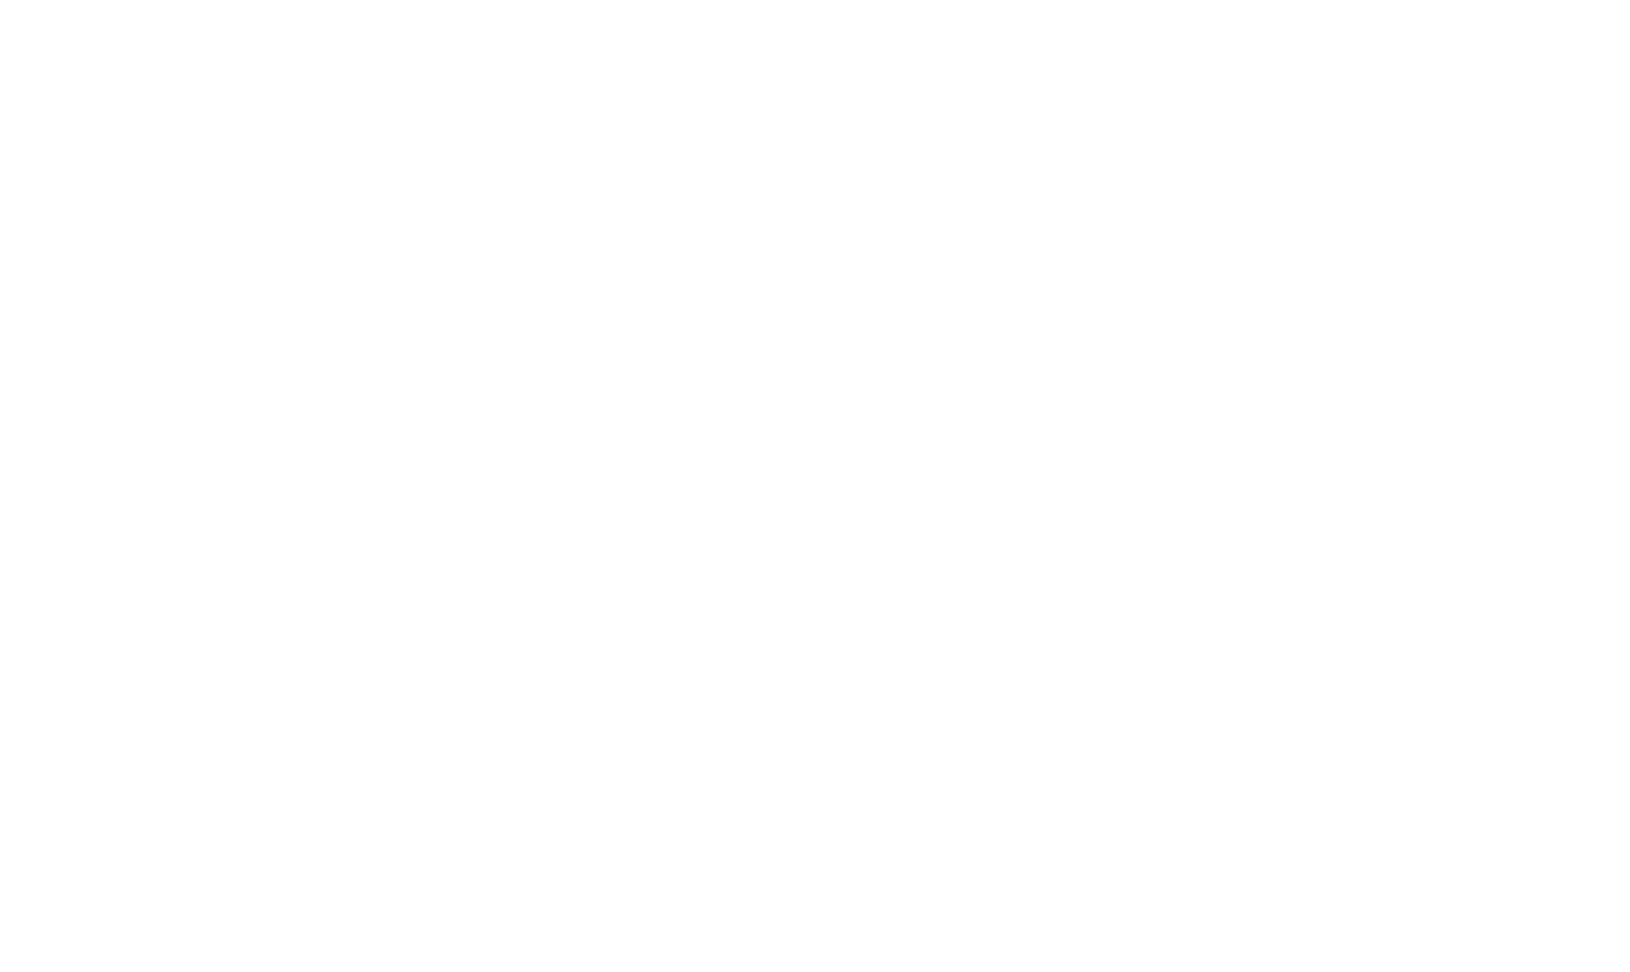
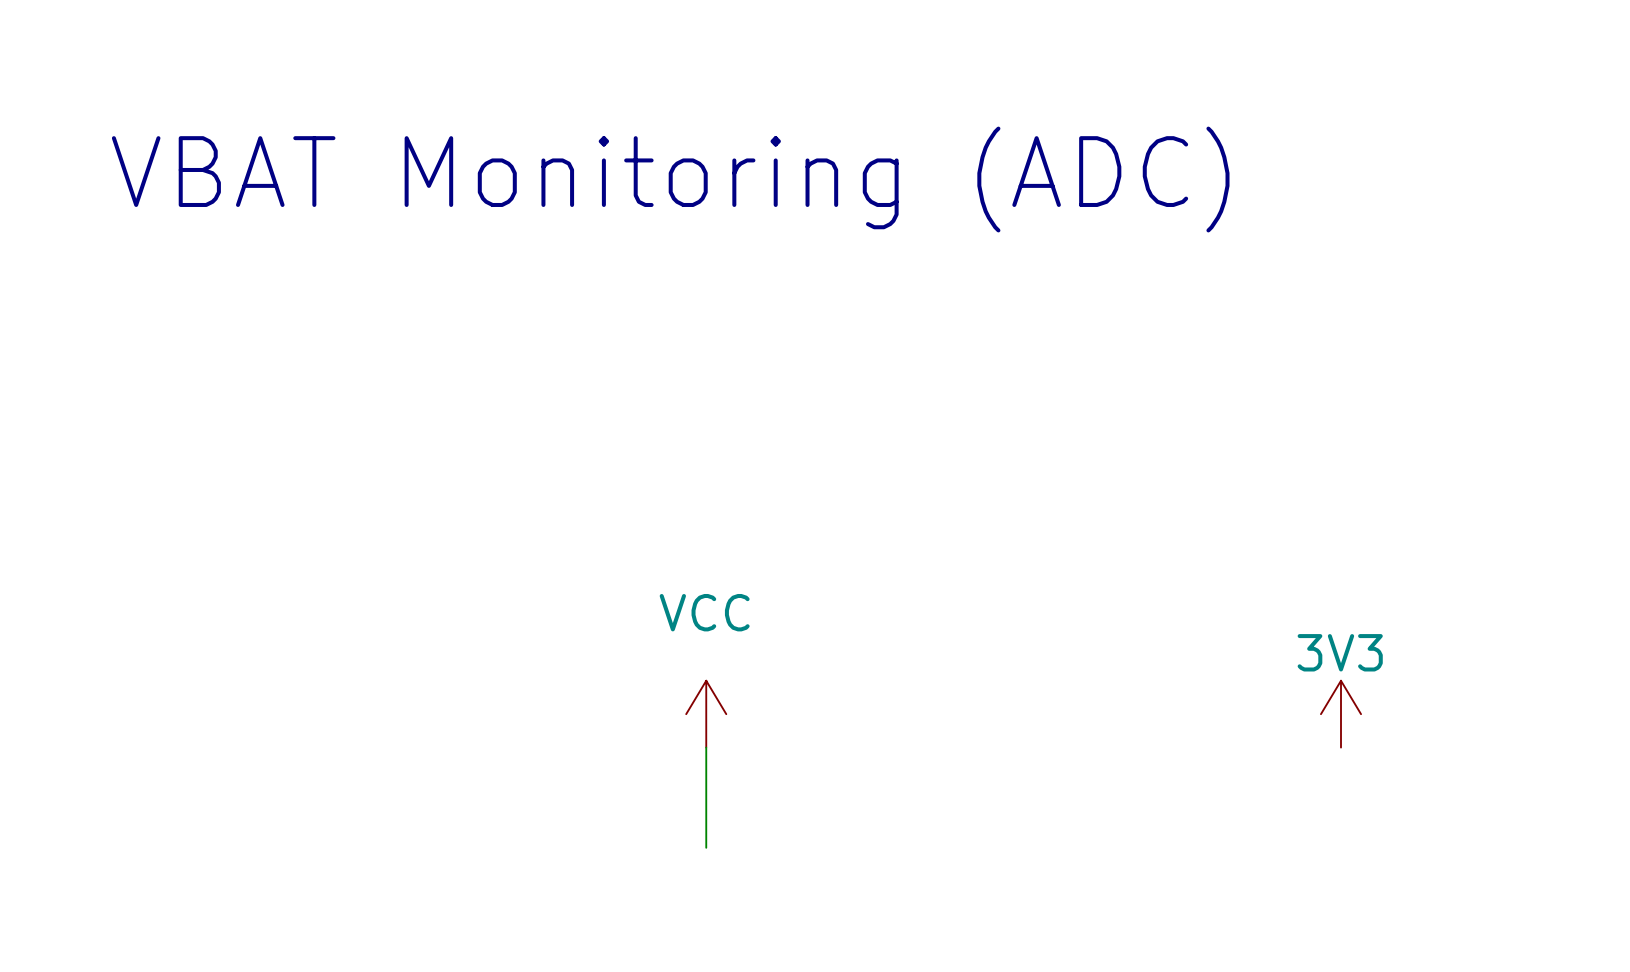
text: none -> VBAT Monitoring (ADC) (670, 179)
power symbol: none -> VCC (706, 714)
power symbol: none -> 3V3 (1341, 714)
wire: none -> (706, 747) (706, 847)

